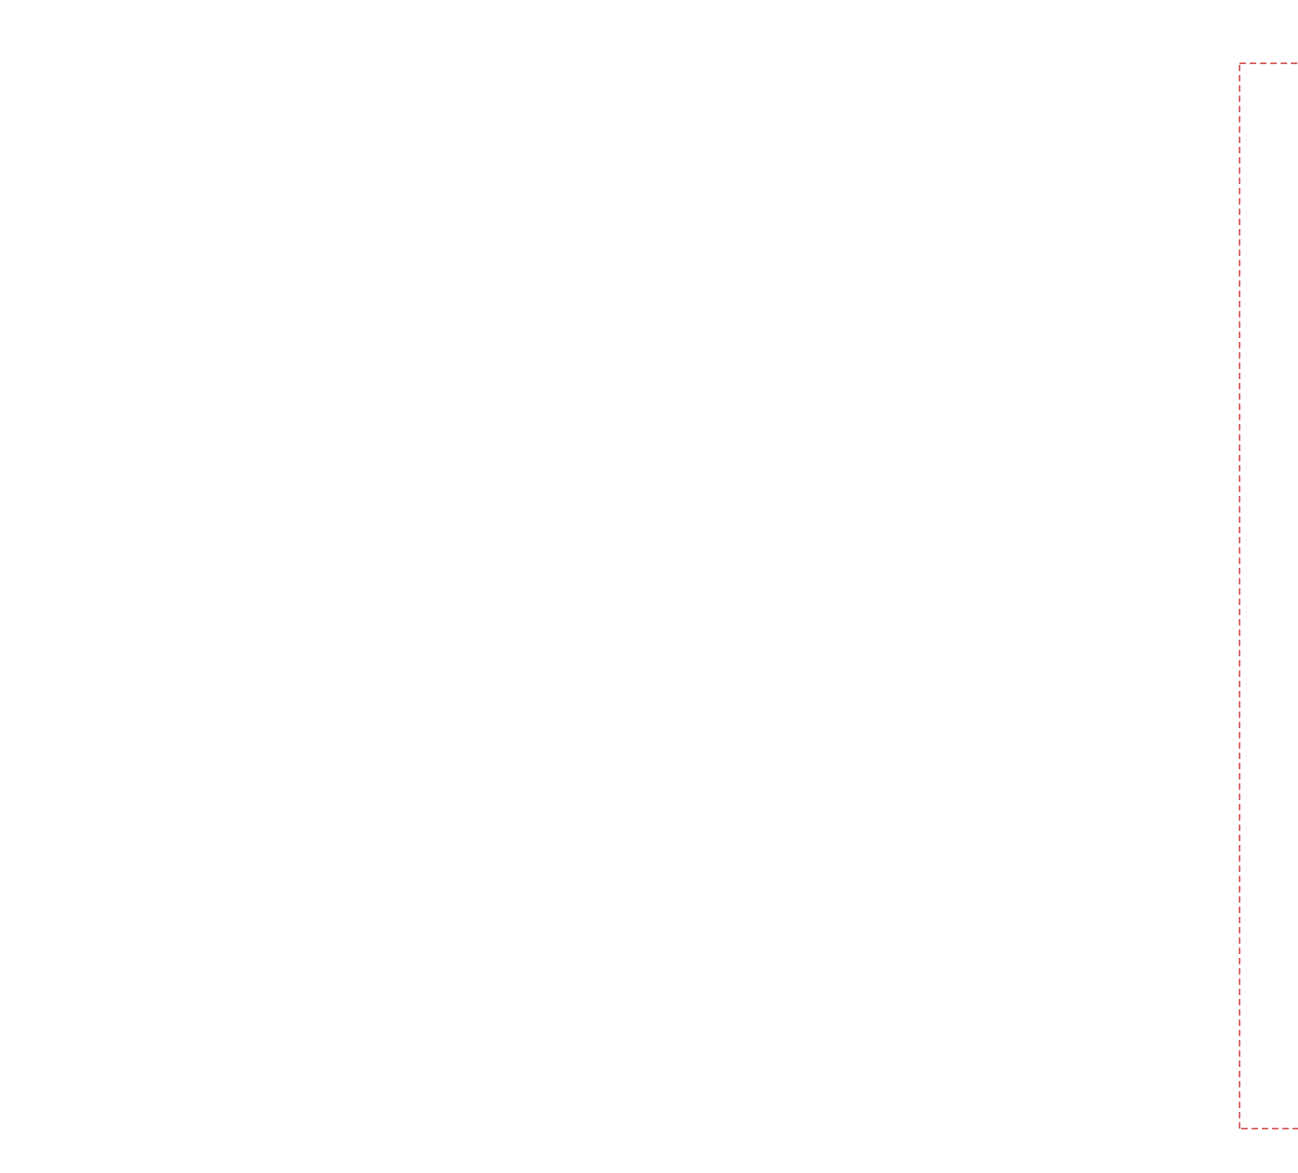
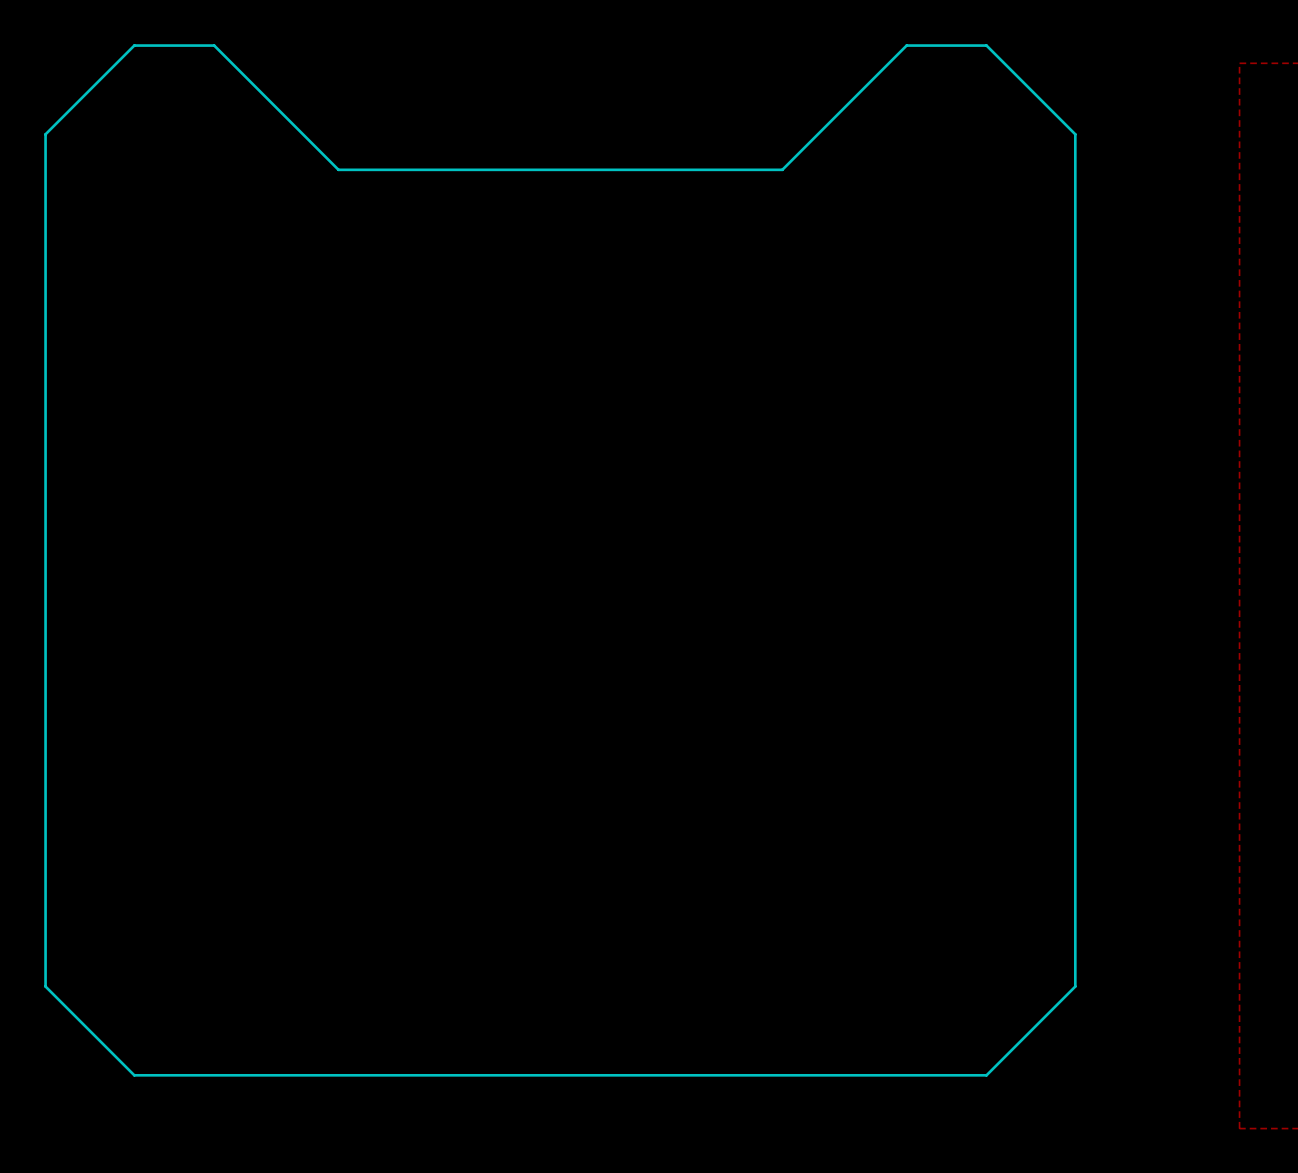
drawing: none -> [44, 44, 1077, 1077]

